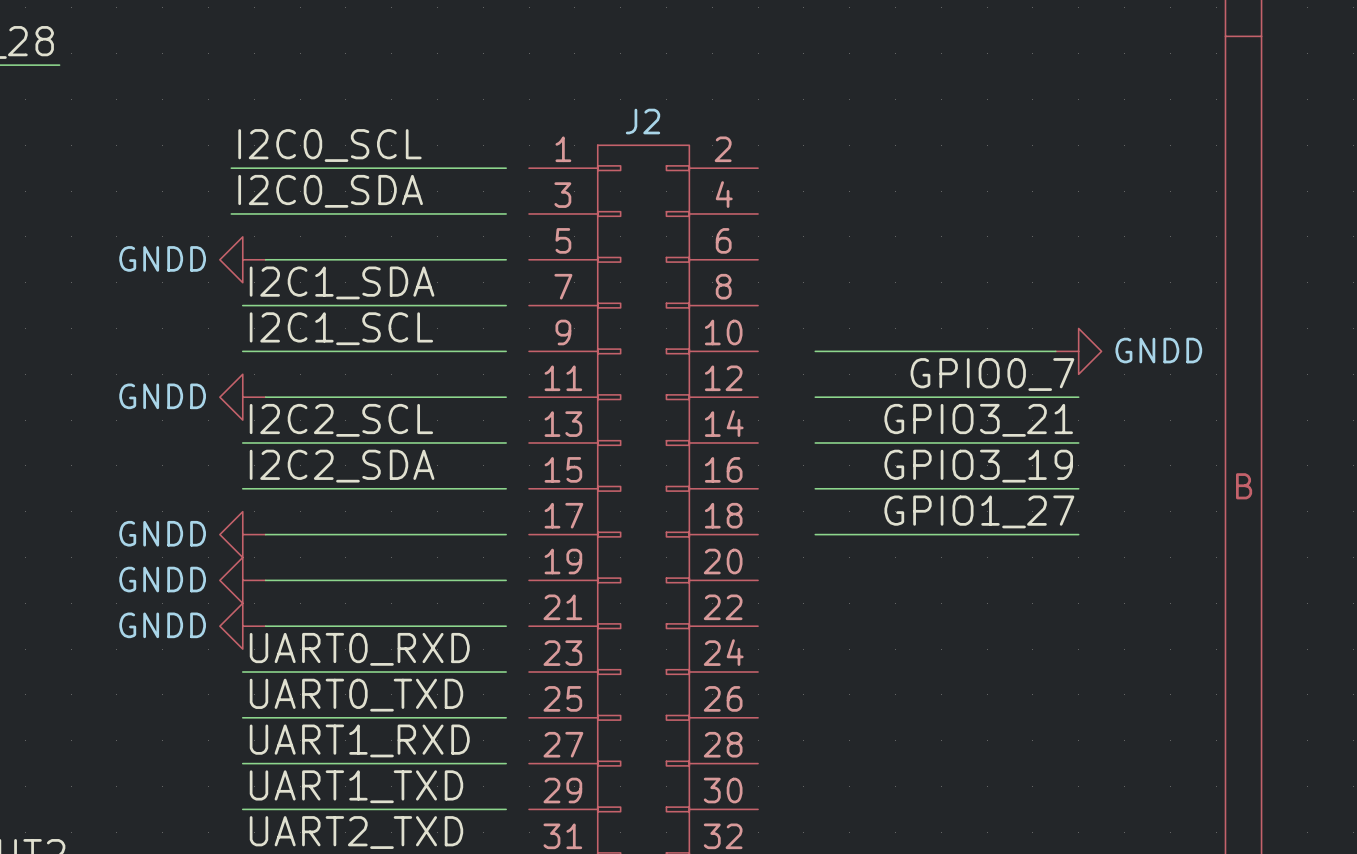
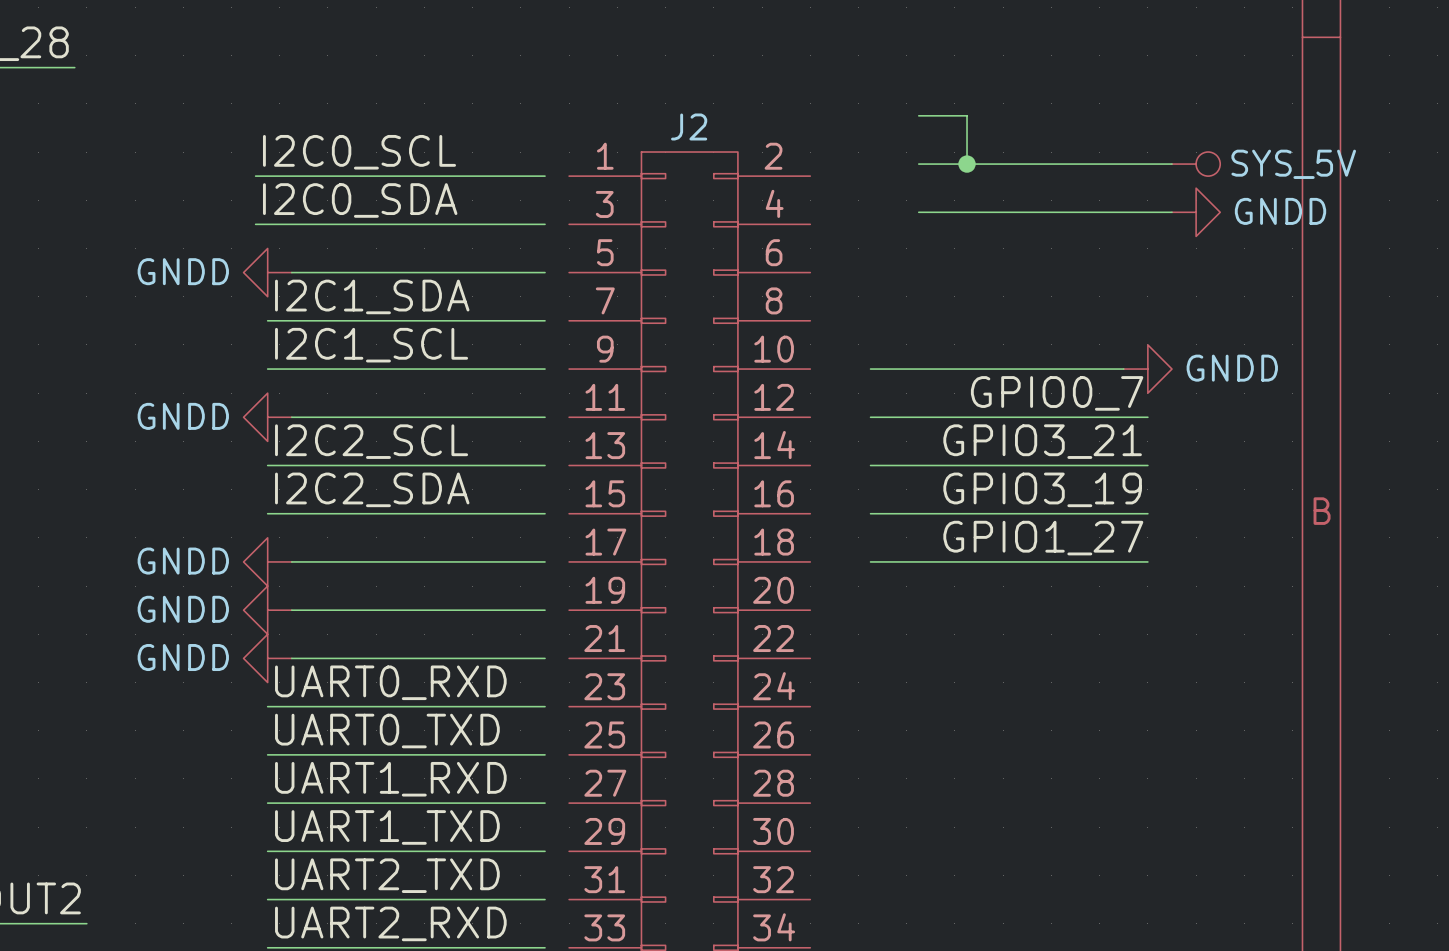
wire: none -> (918, 115) (967, 115) (967, 164)
wire: none -> (918, 164) (1171, 164)
junction: none -> (967, 164)
power symbol: none -> SYS_5V (1196, 164)
wire: none -> (918, 212) (1171, 212)
power symbol: none -> GNDD (1196, 212)

